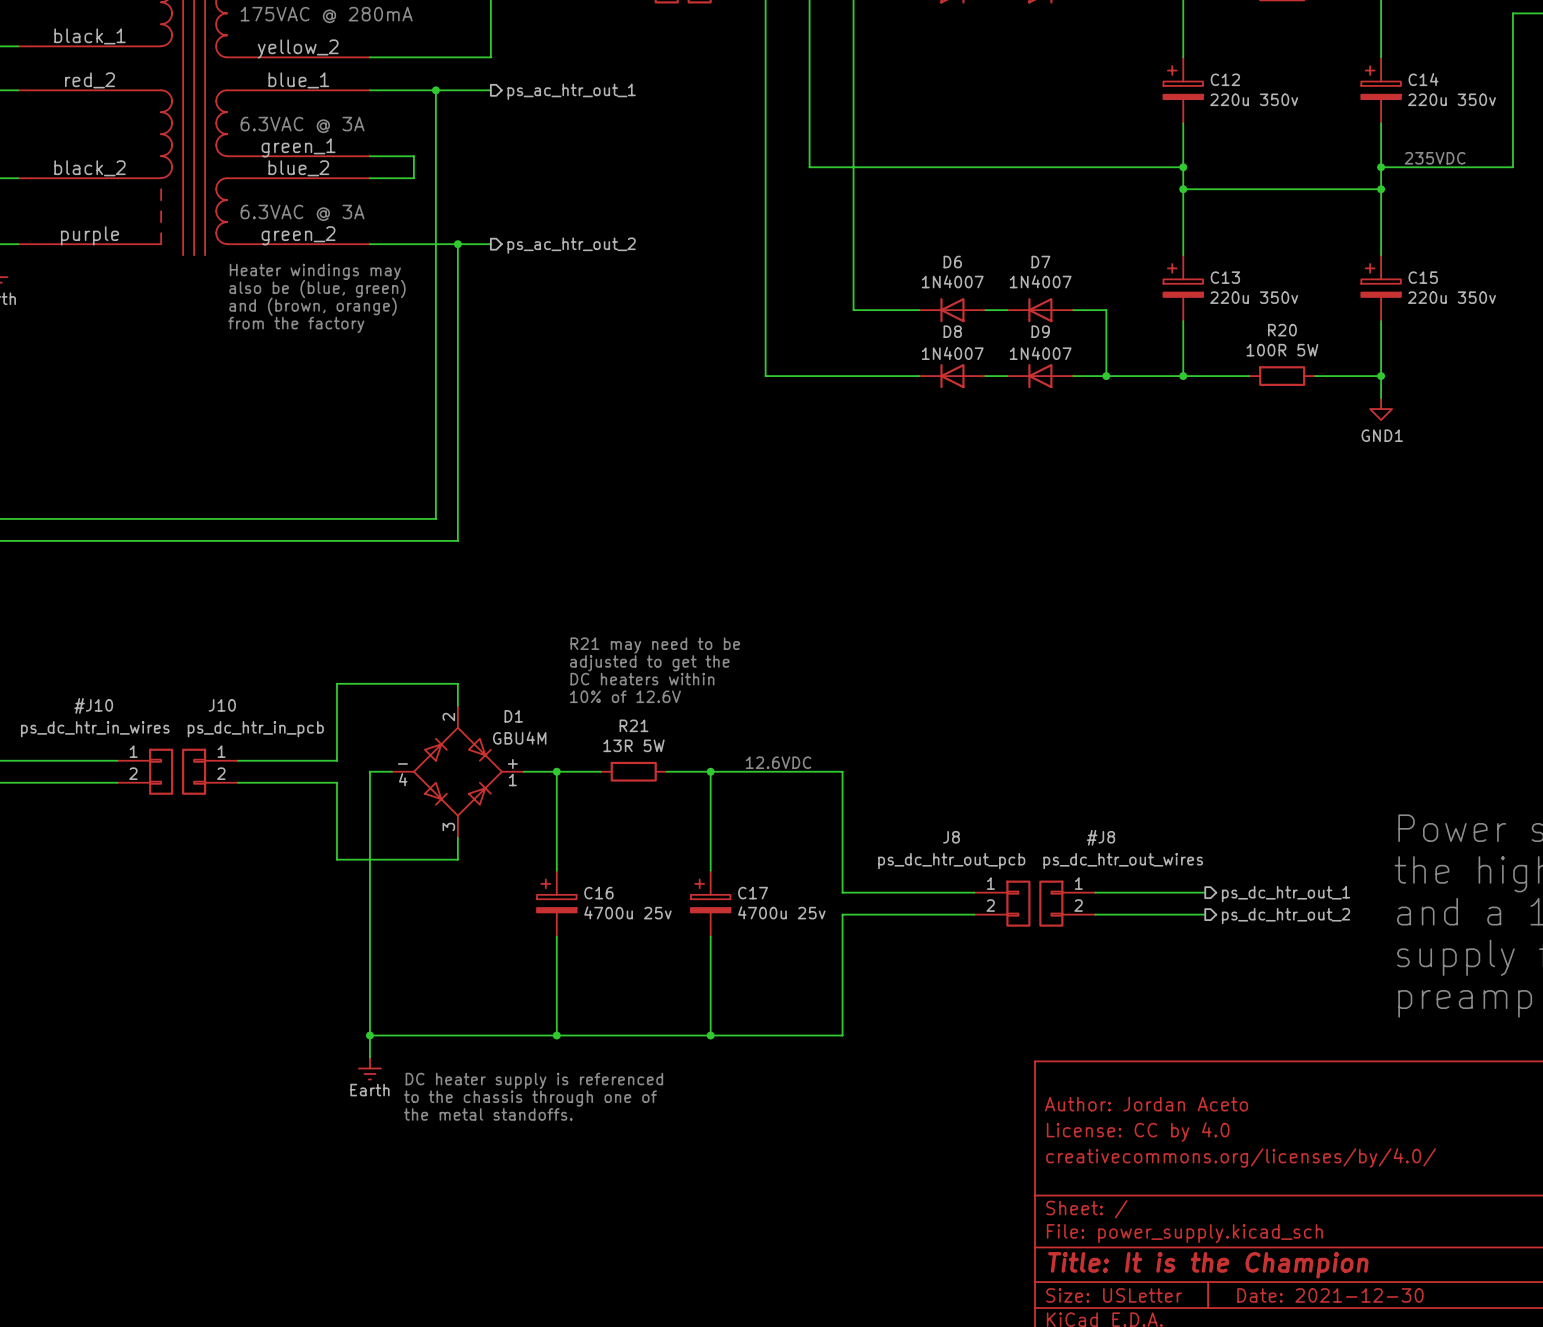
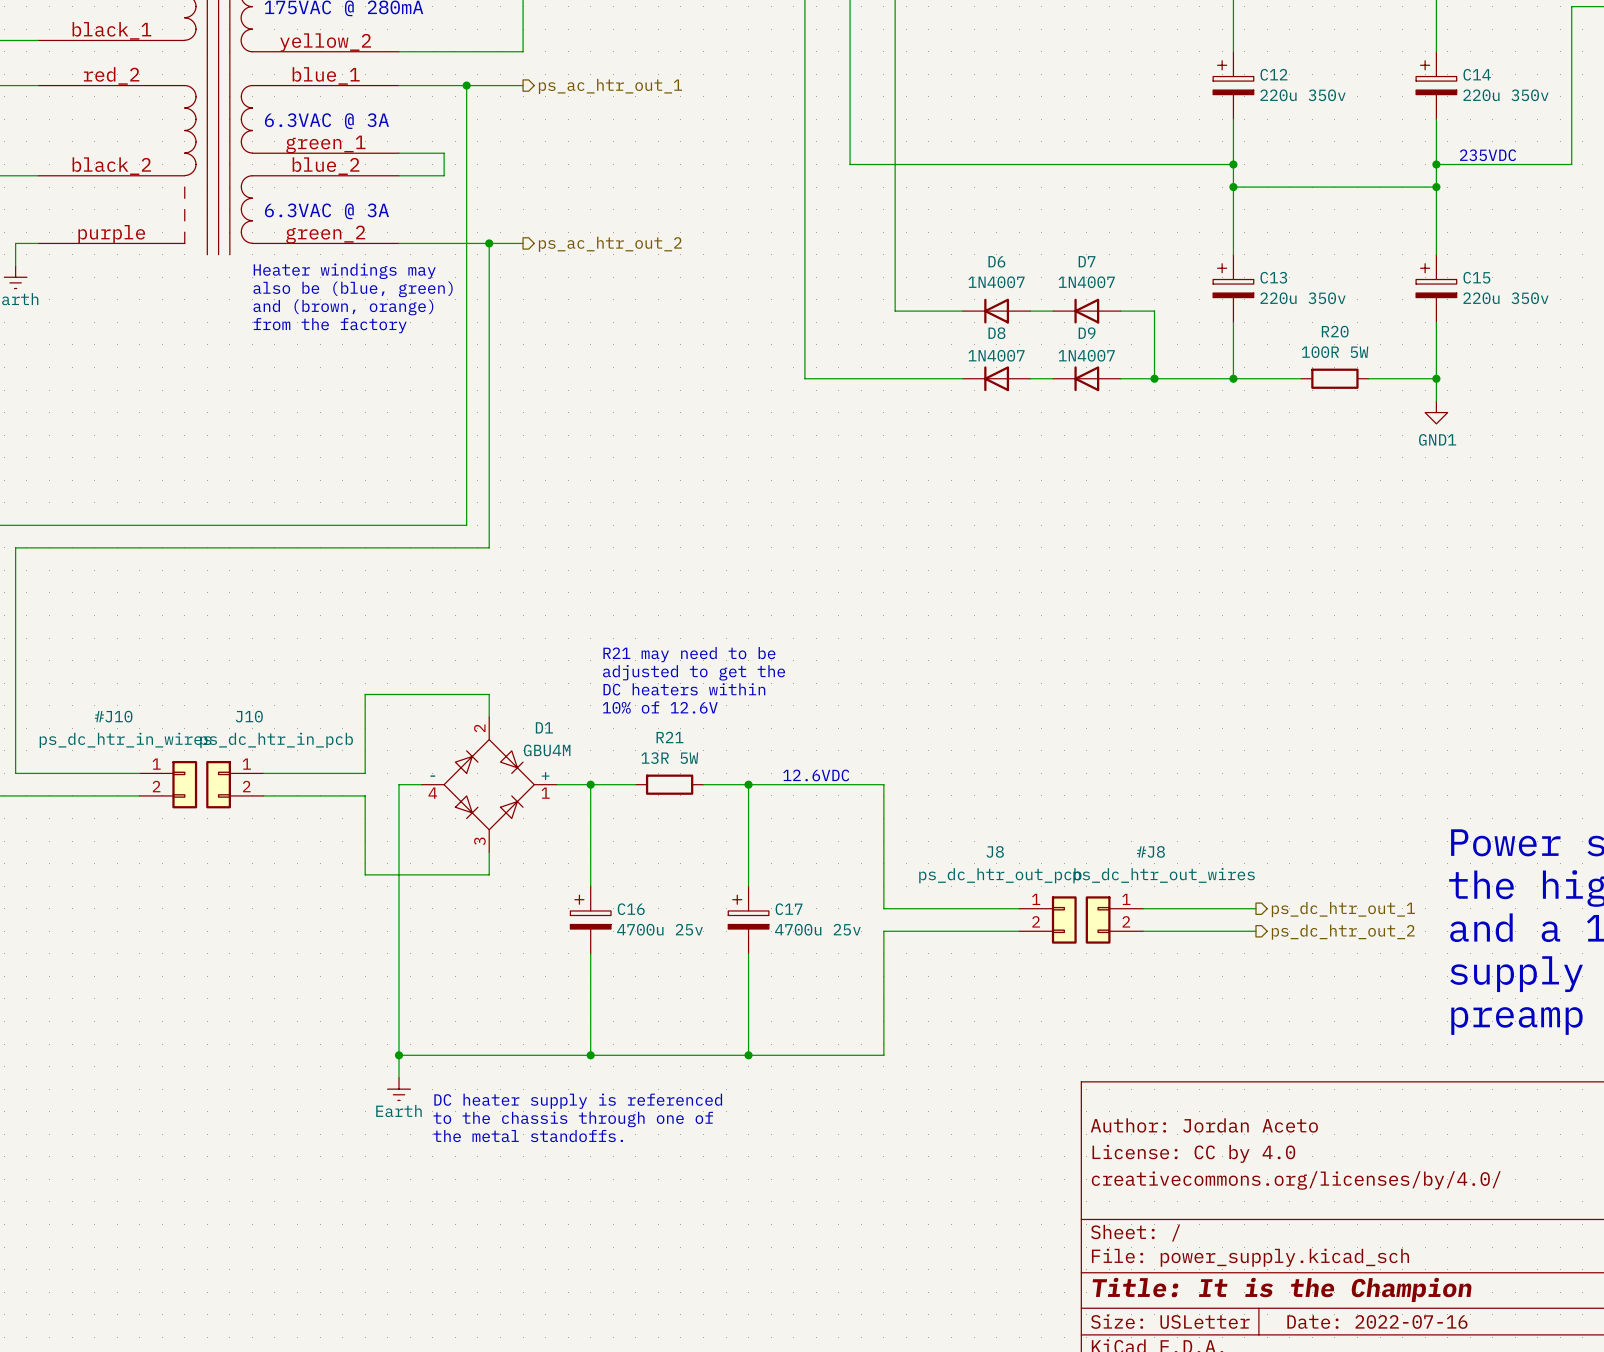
title block: Date: 2021-12-30 (1330, 1295) -> Date: 2022-07-16 (1377, 1321)

